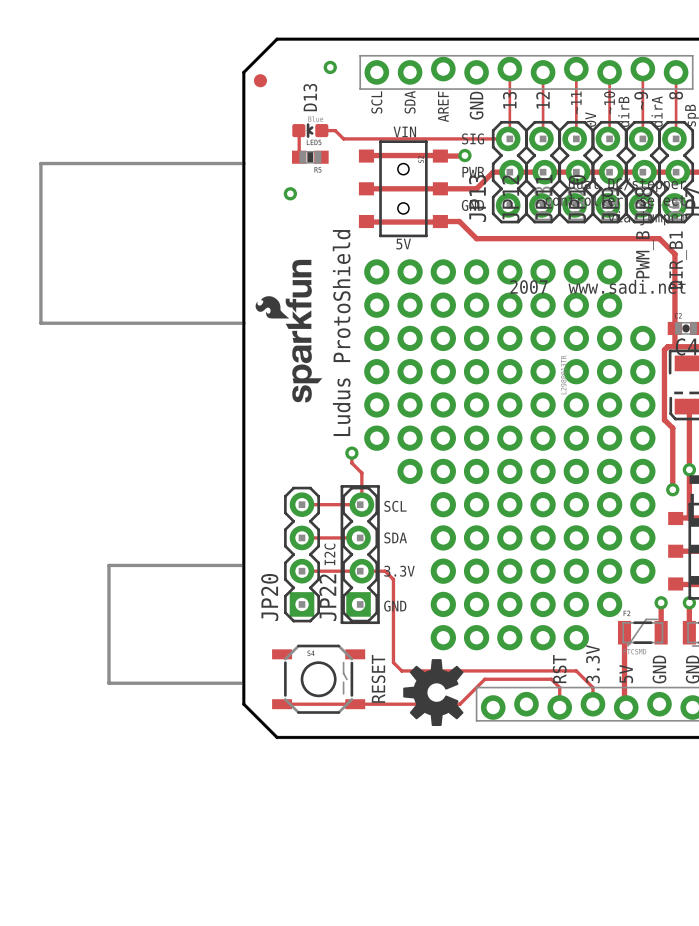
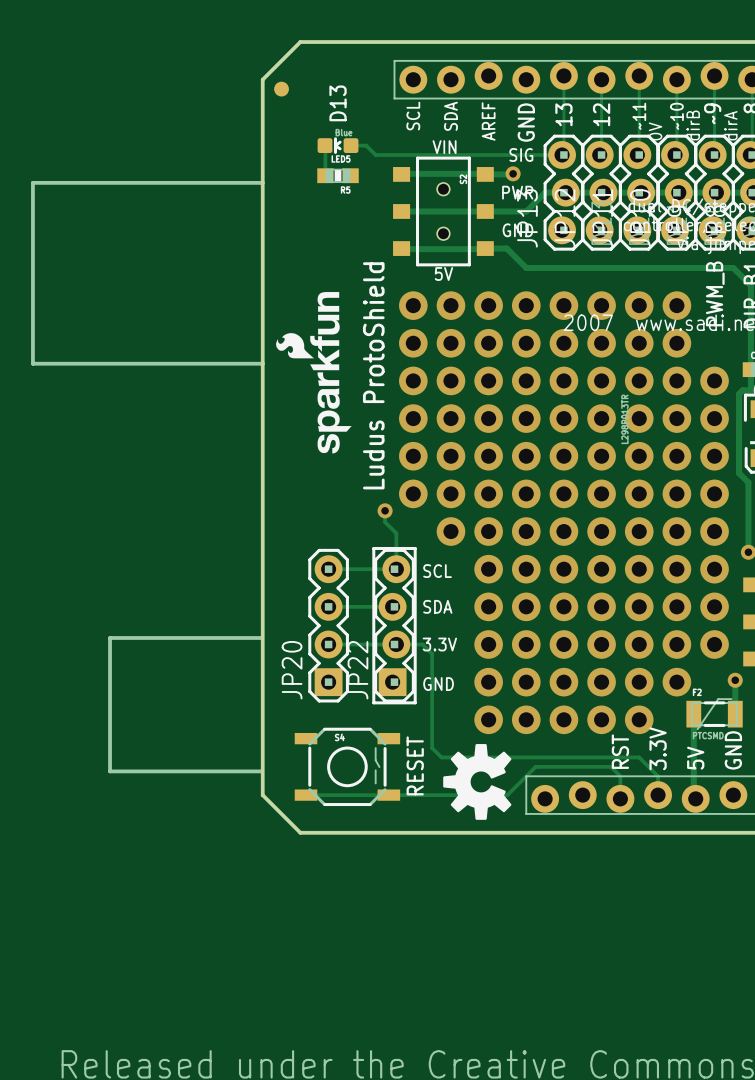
via: (330, 67) -> none
via: (290, 193) -> none
text: I2C (329, 554) -> none

